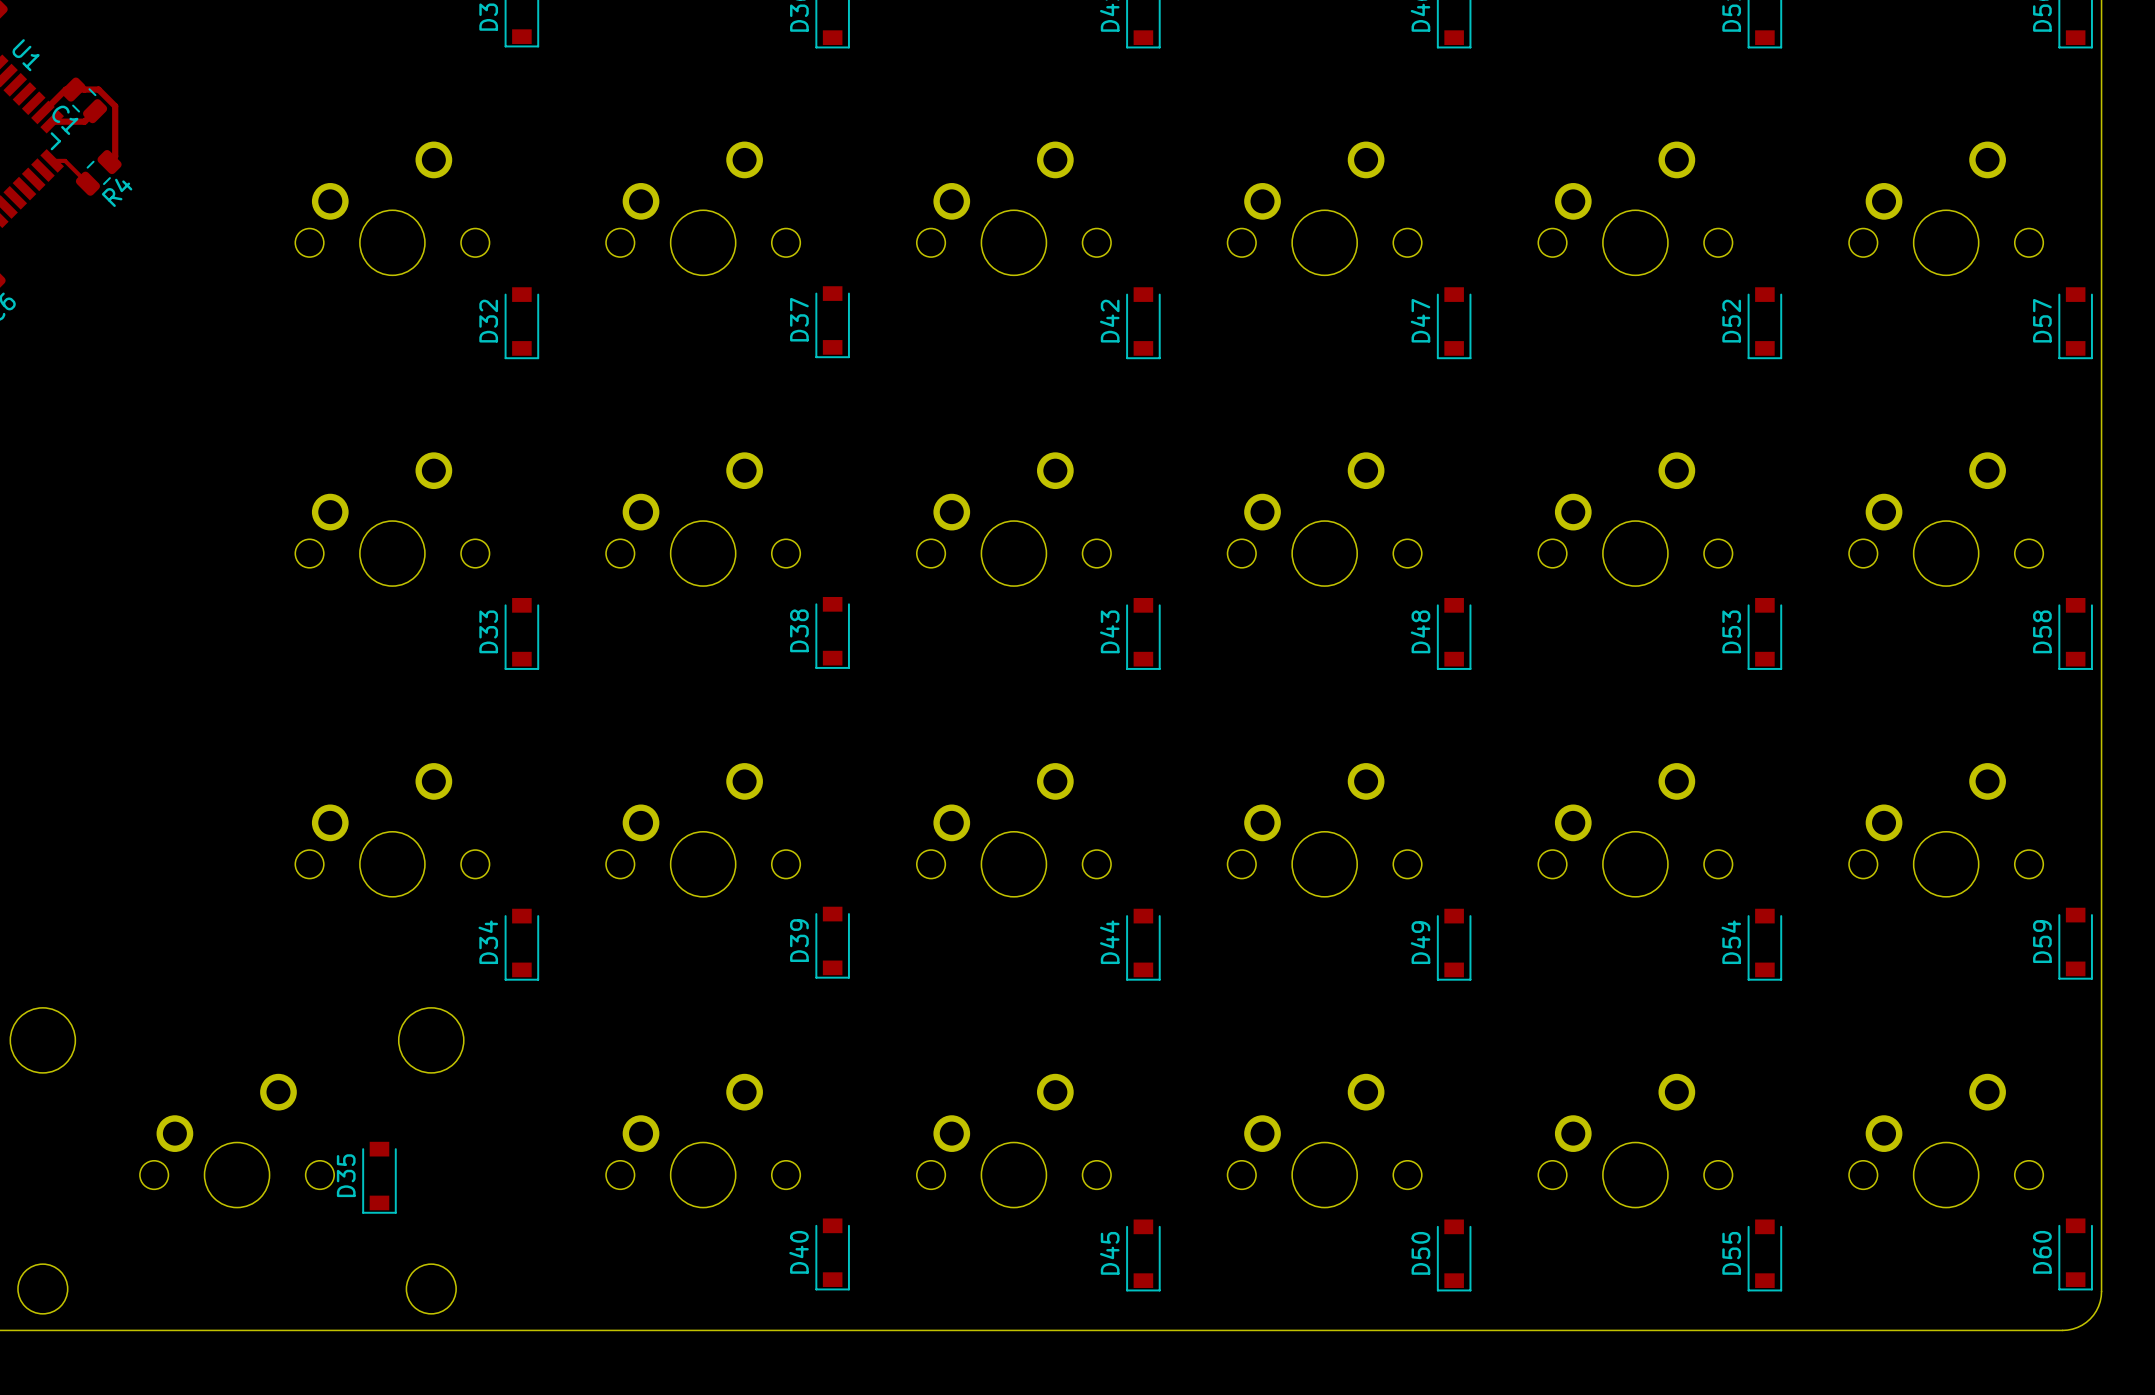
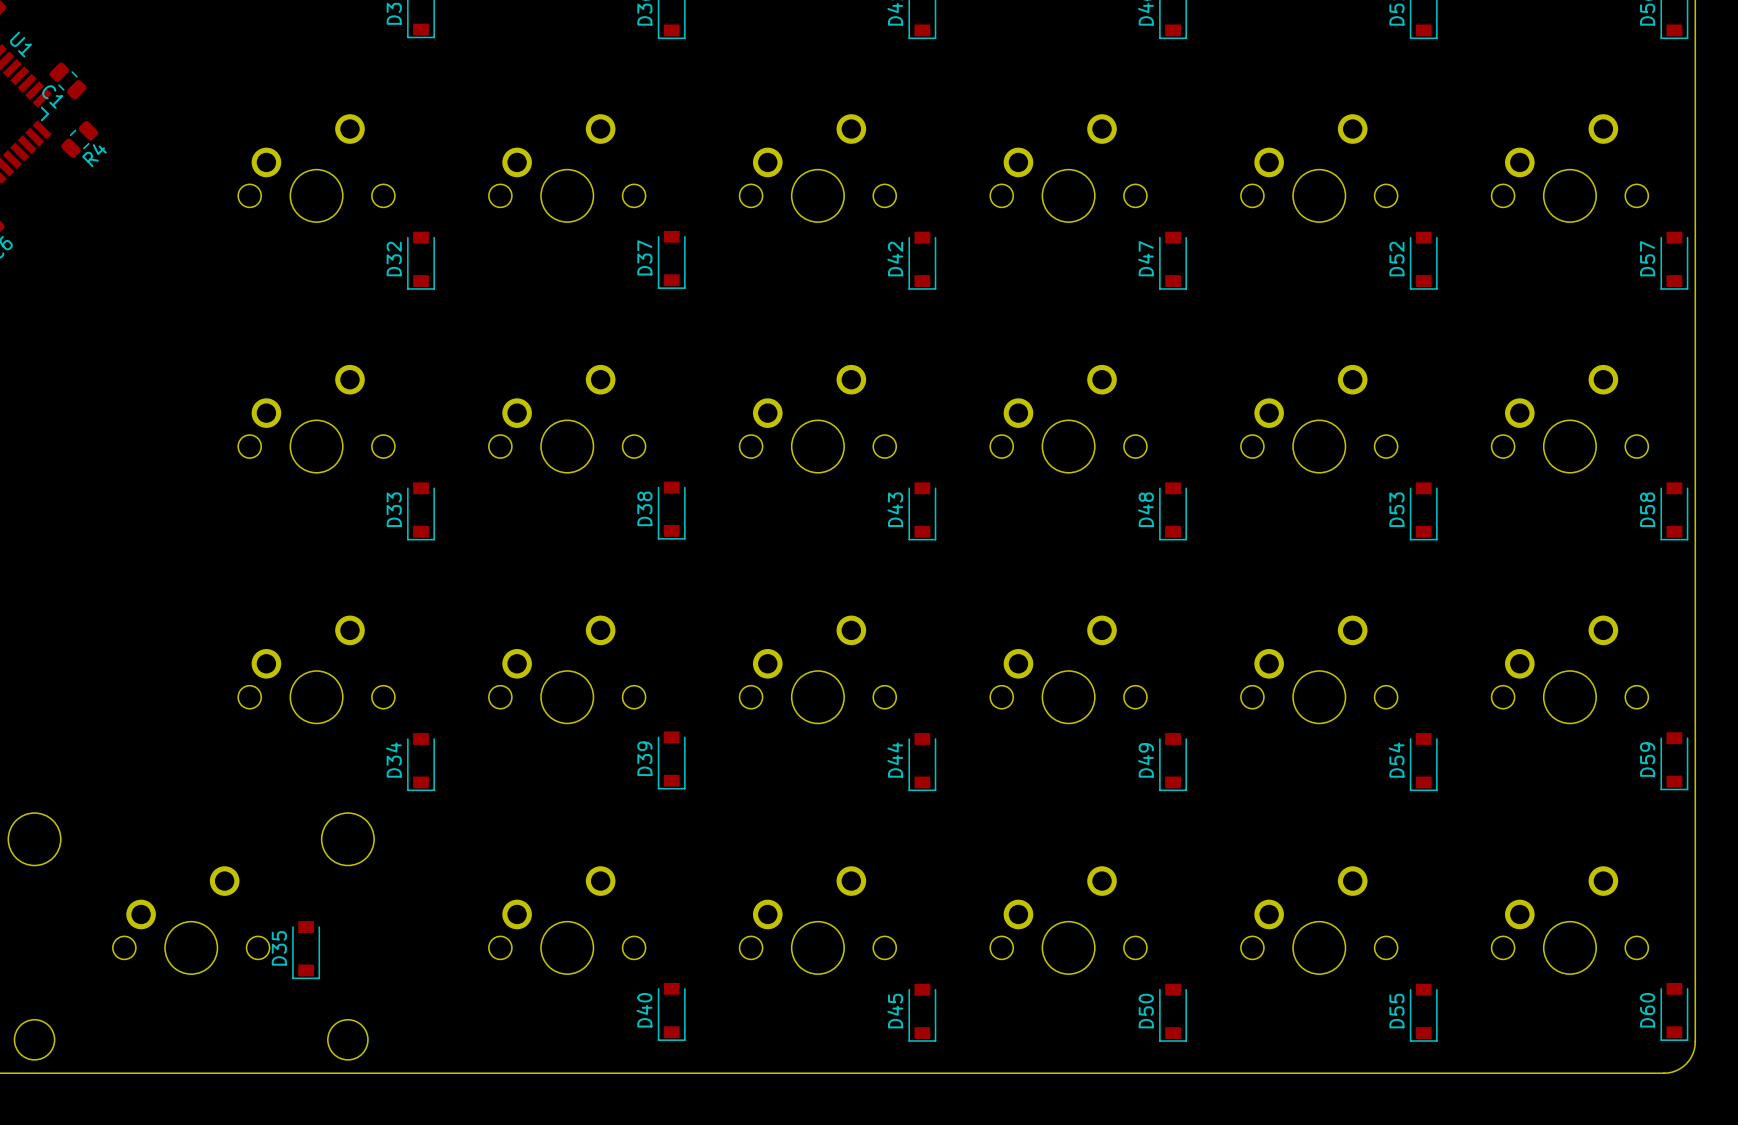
track: (95, 111) (84, 121) (52, 121) -> none
track: (42, 112) (65, 89) (98, 89) (115, 106) (115, 156) (109, 162) -> none
track: (52, 160) (65, 160) (87, 183) -> none

